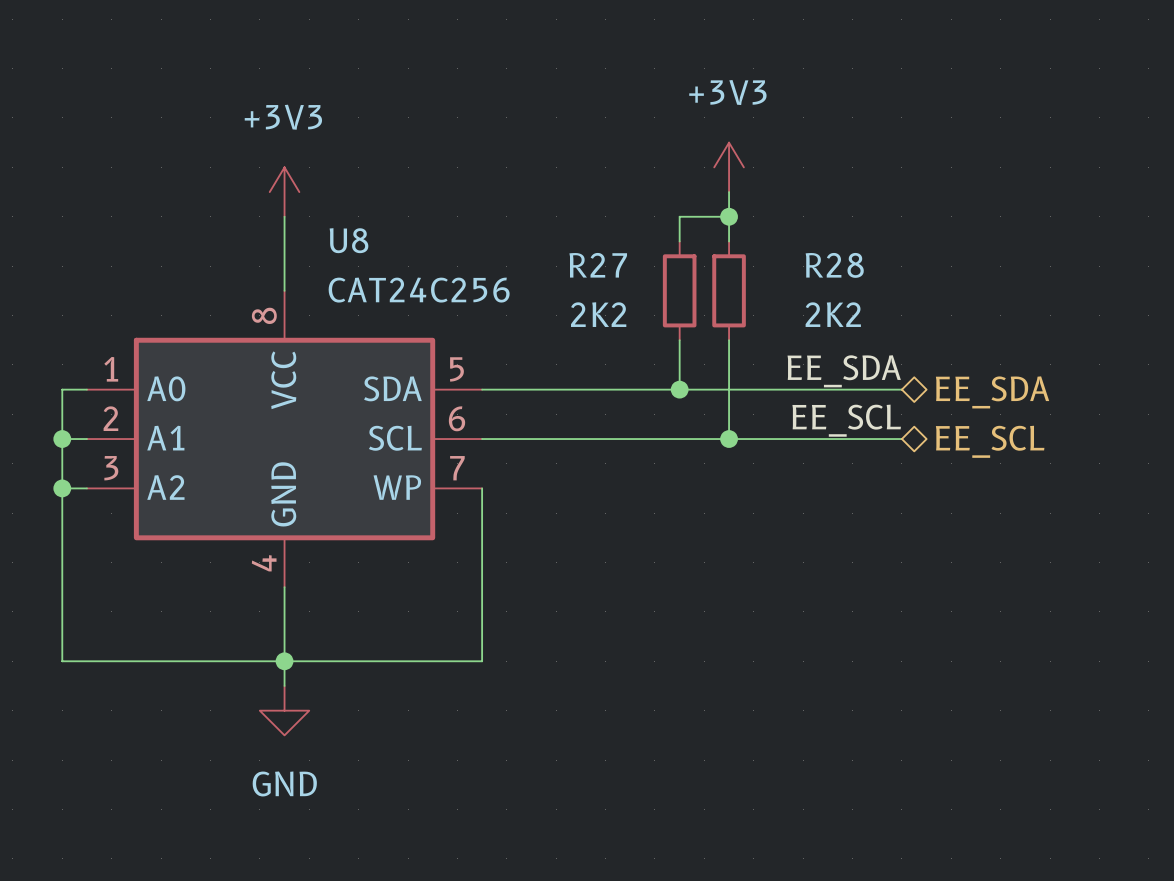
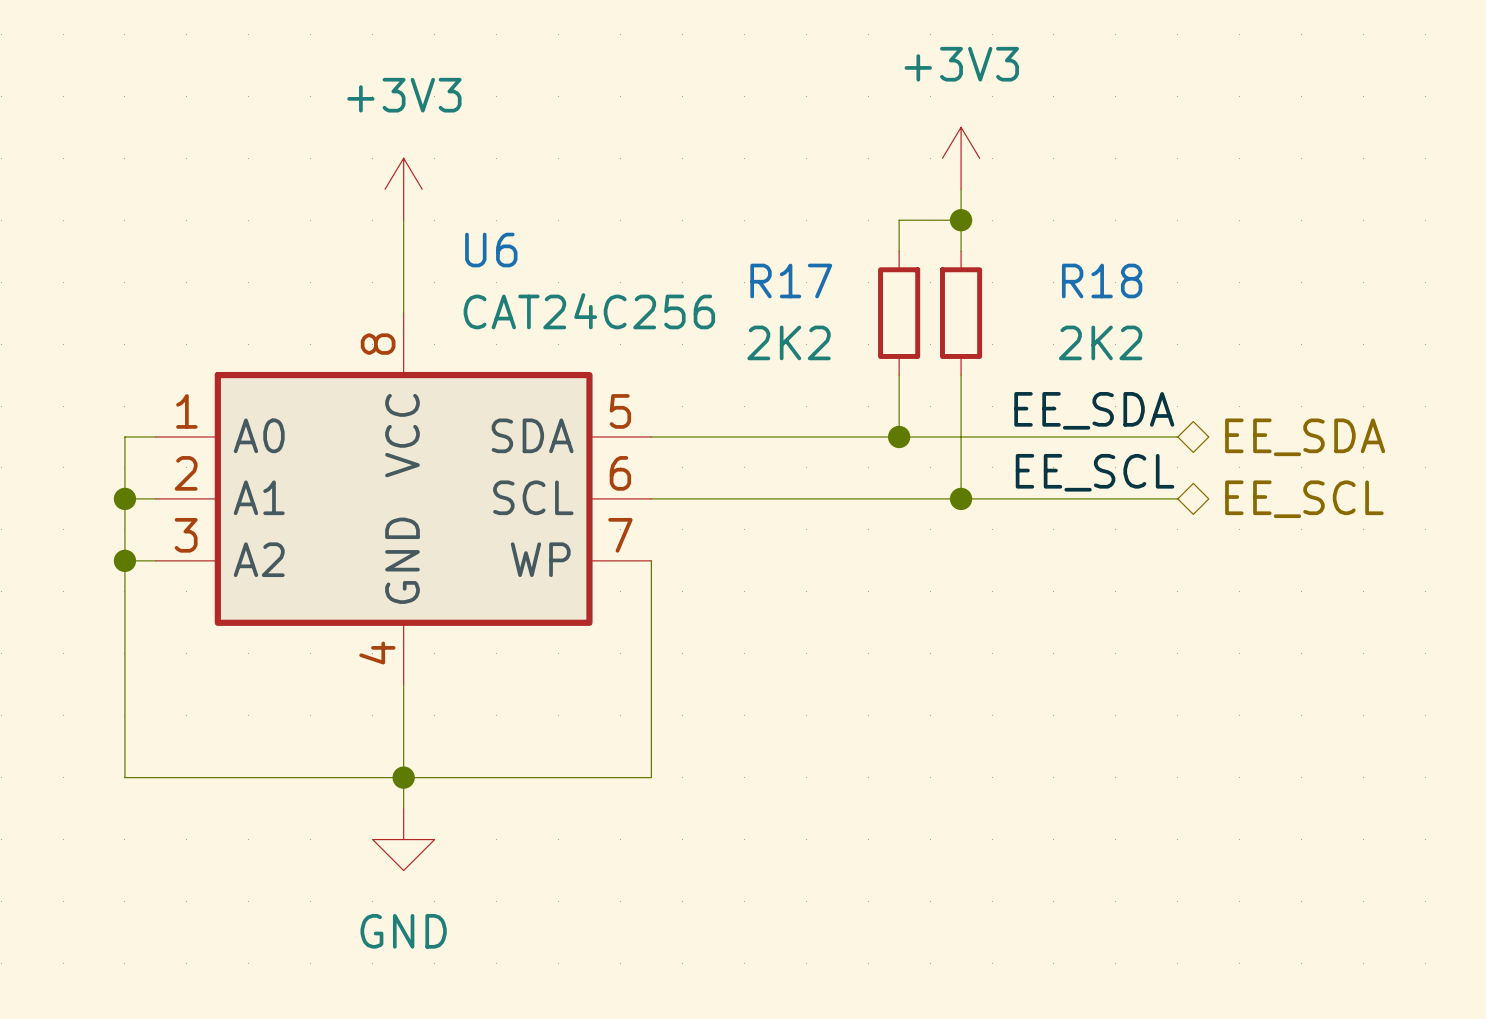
U8 name: U8 (348, 240) -> U6 (491, 250)
R27 name: R27 (598, 265) -> R17 (791, 280)
R28 name: R28 (834, 265) -> R18 (1102, 280)

